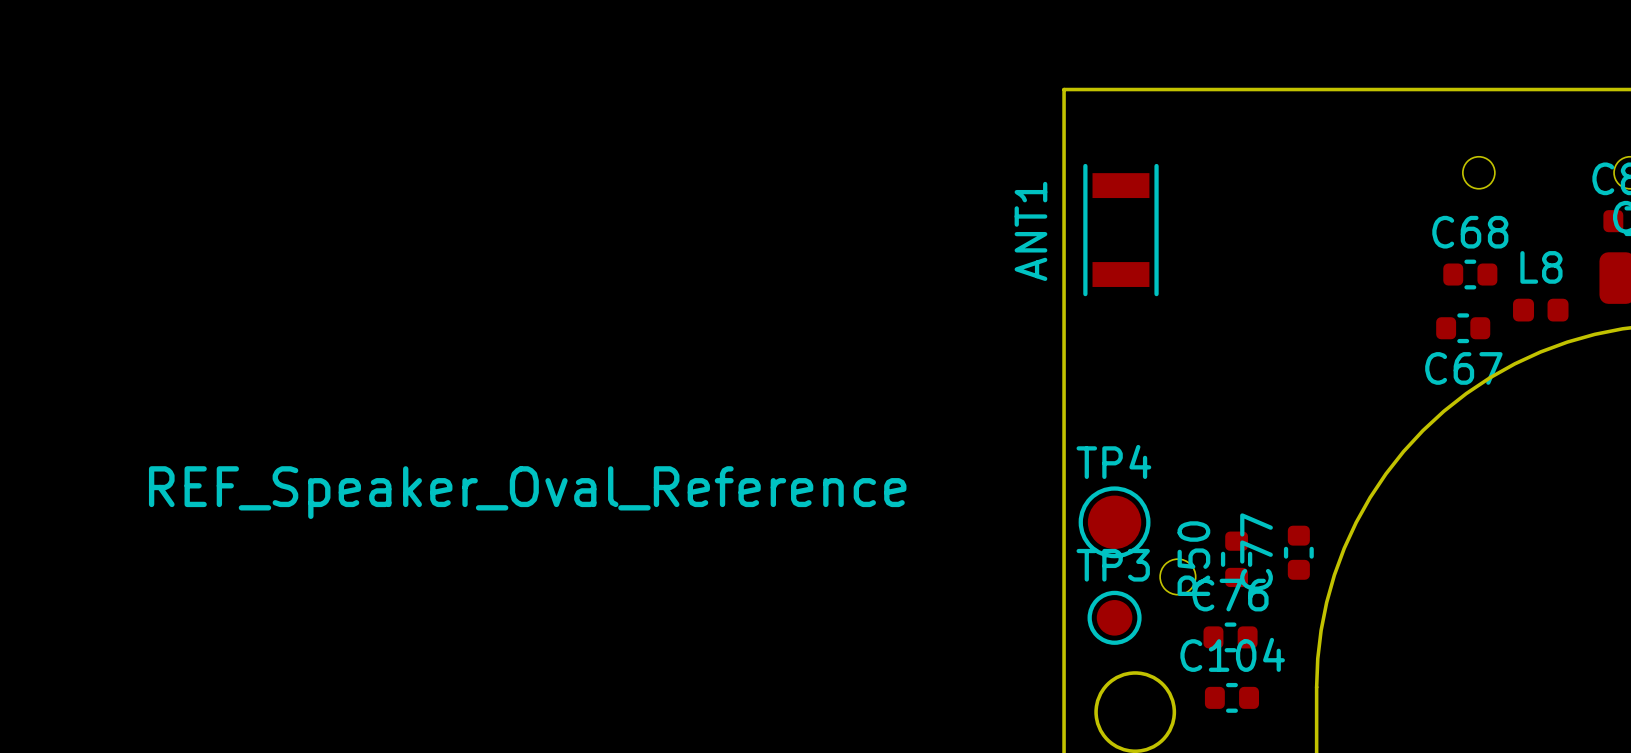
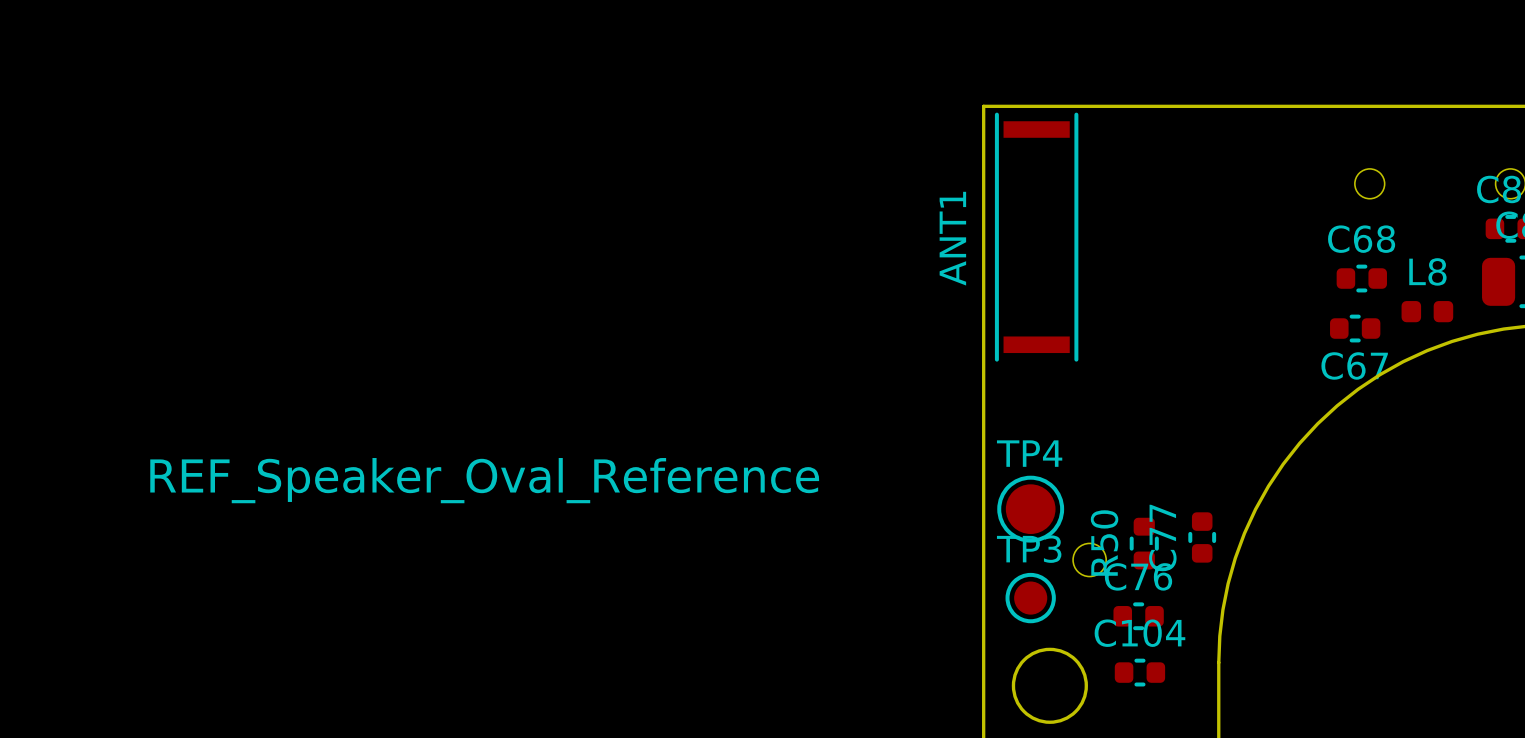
ANT1 footprint: [1083, 163, 1159, 297] -> [994, 112, 1079, 362]

